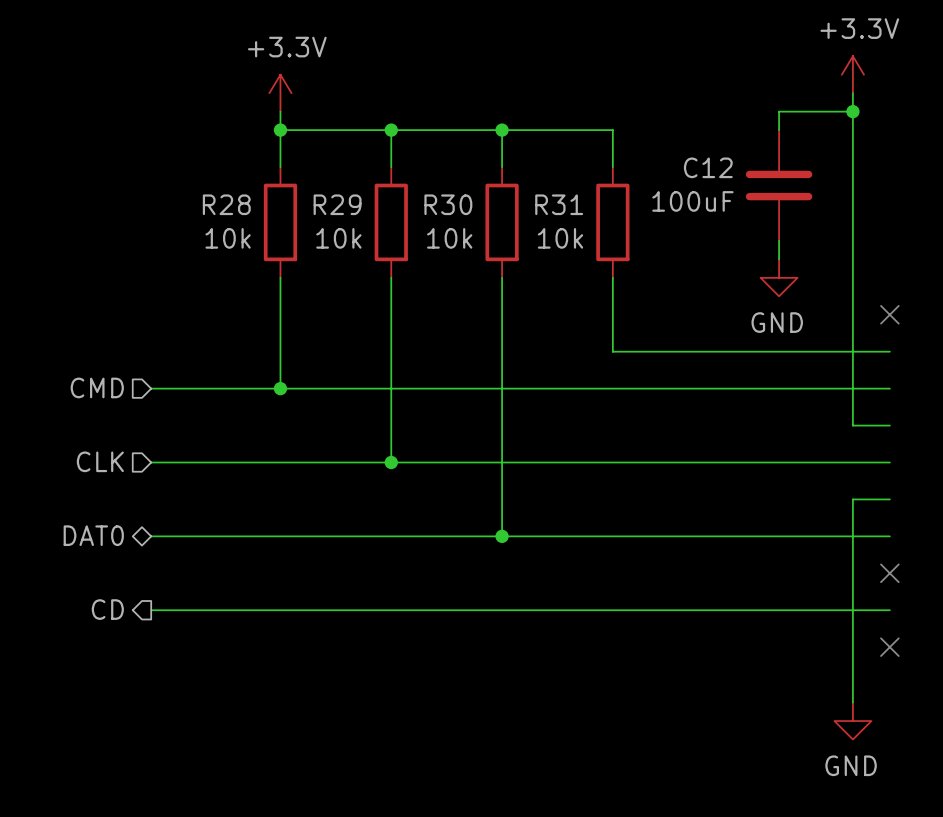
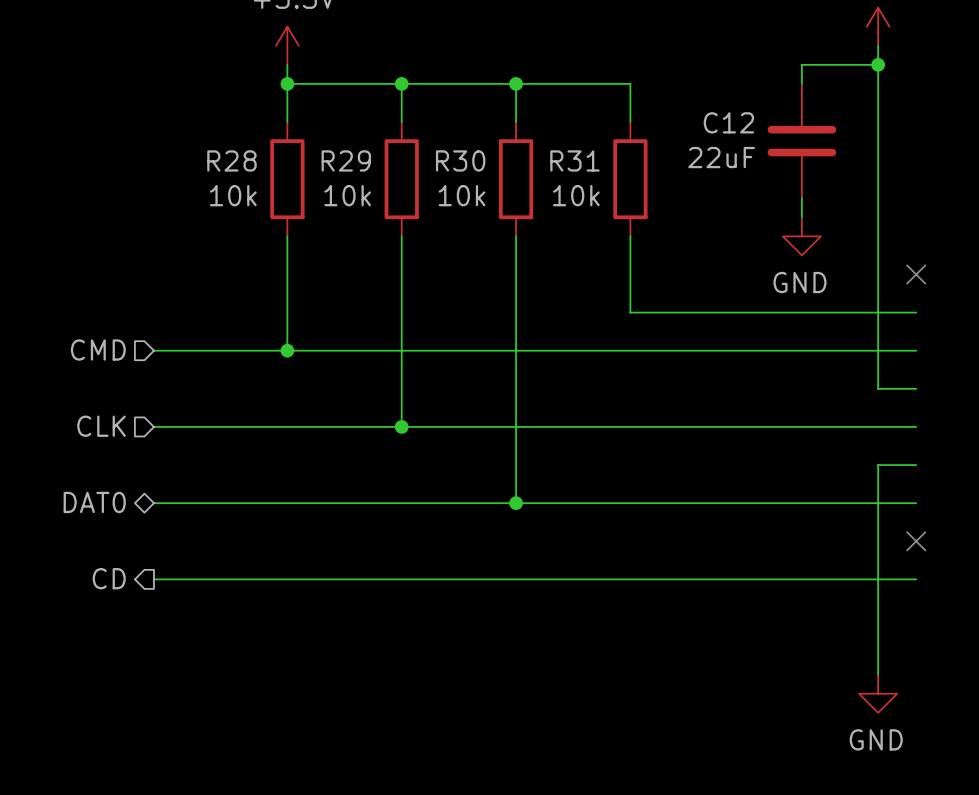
C12 value: 100uF (692, 201) -> 22uF (721, 157)
no-connect mark: (889, 647) -> none

